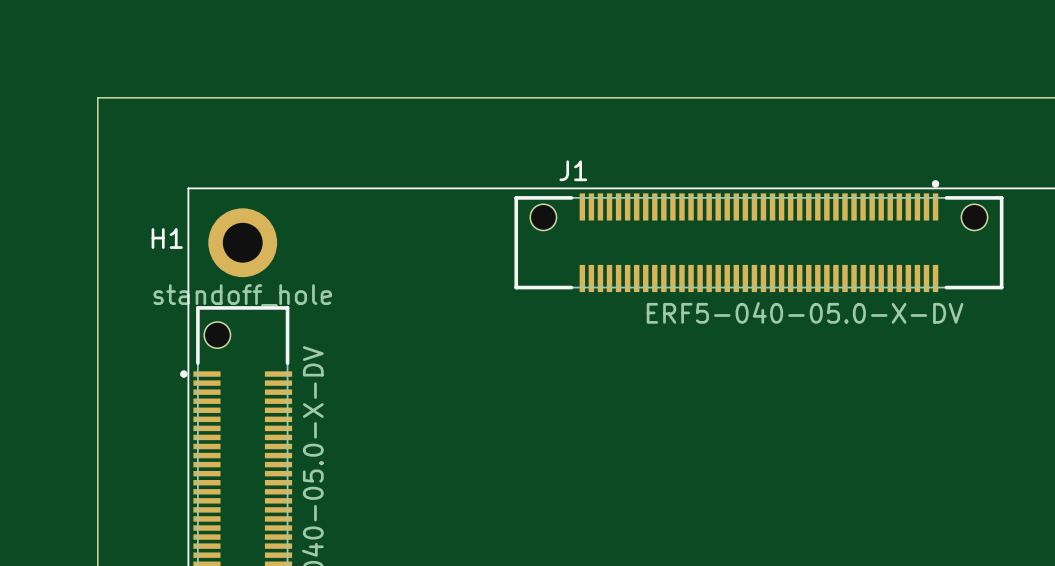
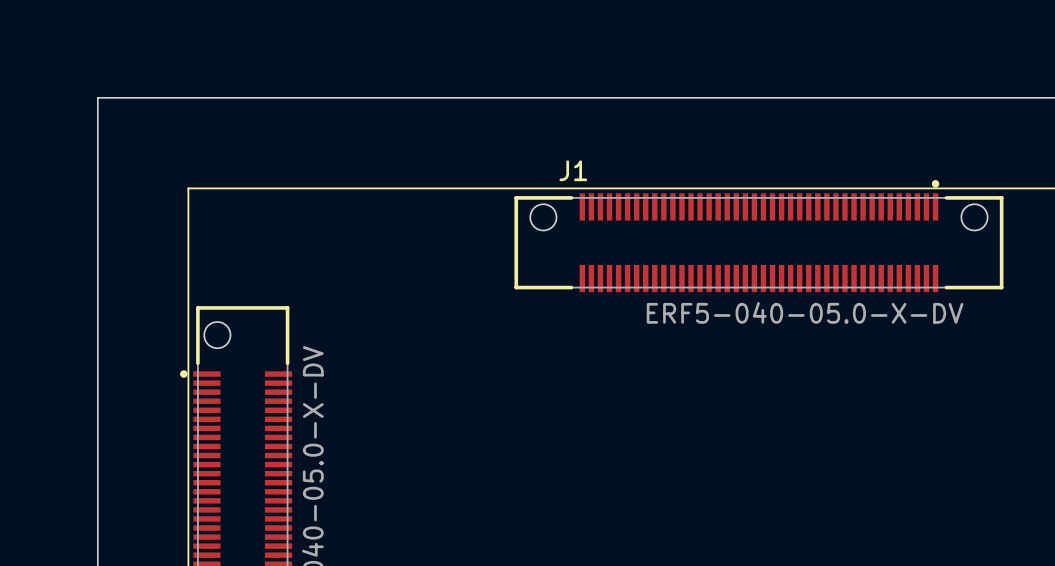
H1: standoff_hole (242, 242) -> none

